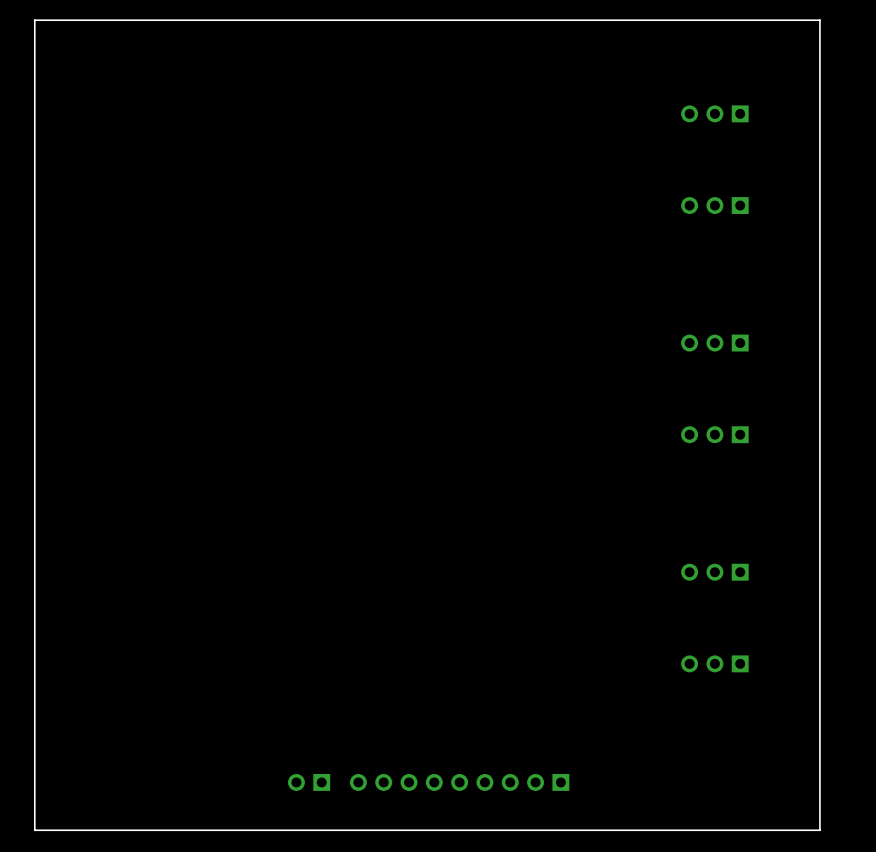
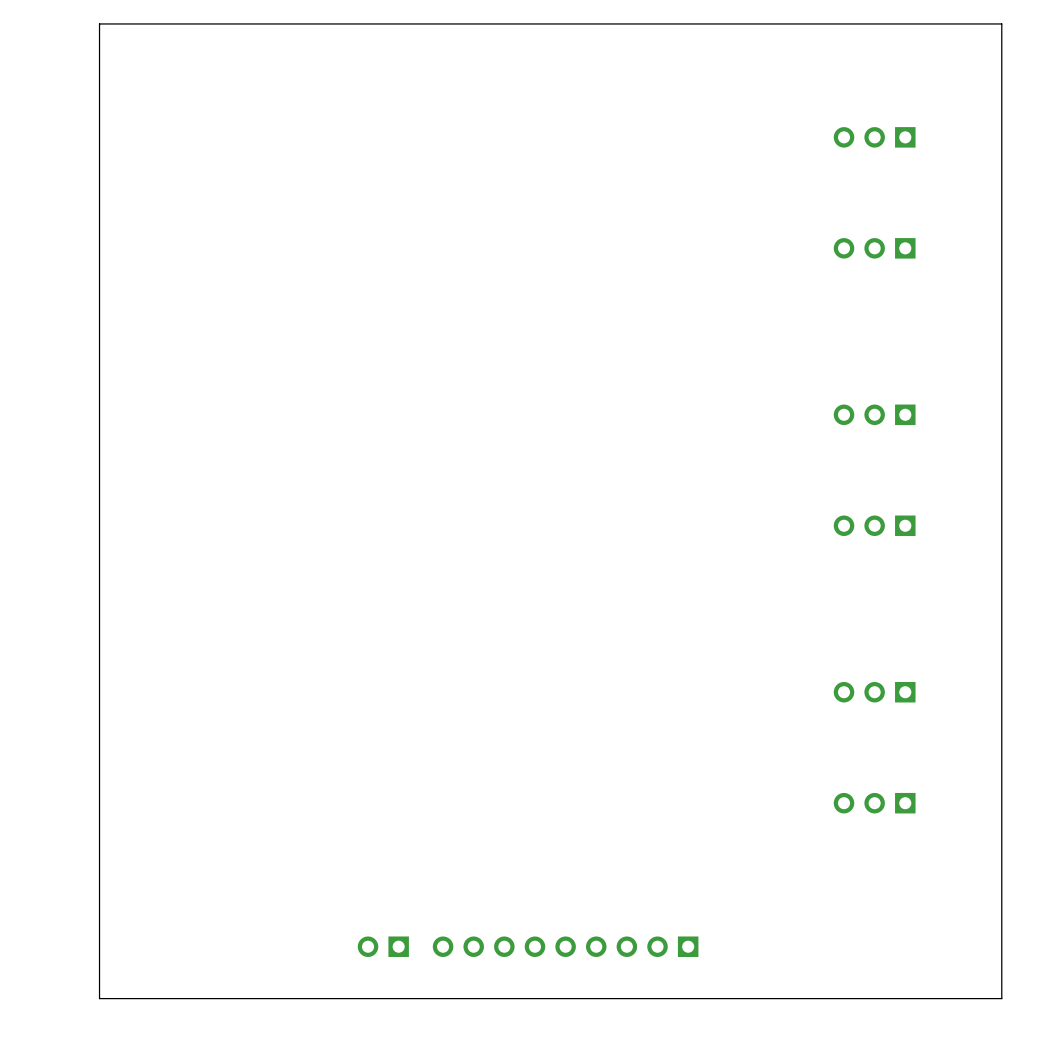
board edge: (74, 20) (34, 20) (34, 830) (819, 830) (819, 825) -> (99, 23) (99, 998) (1001, 998)

